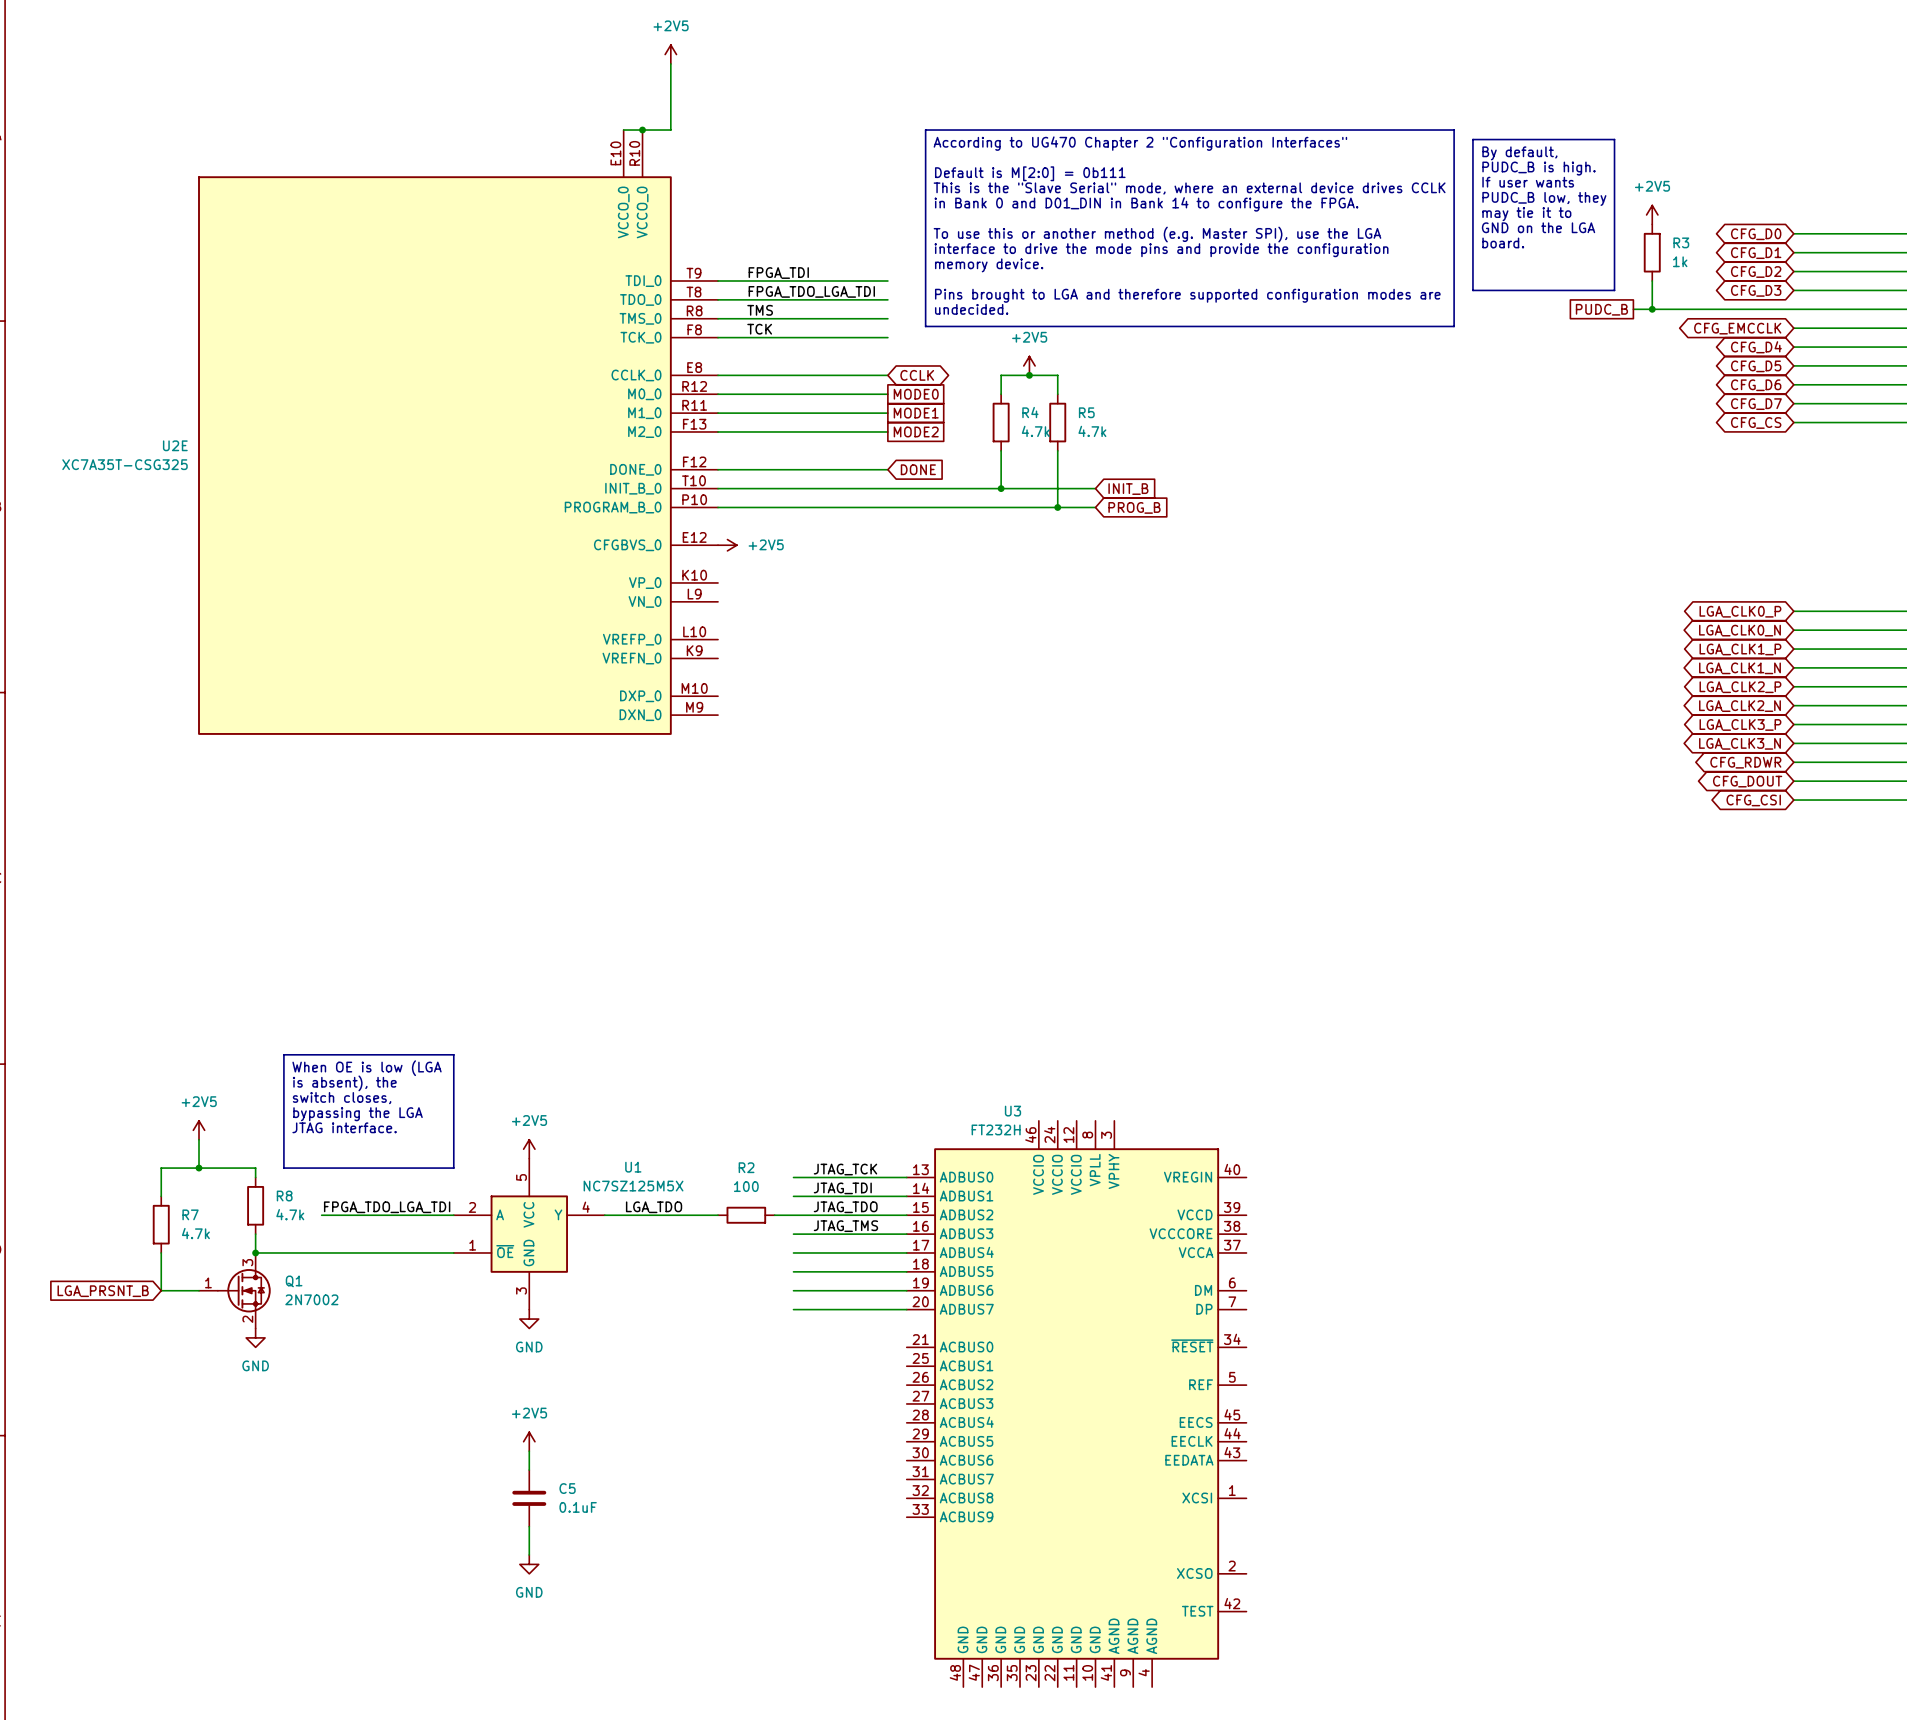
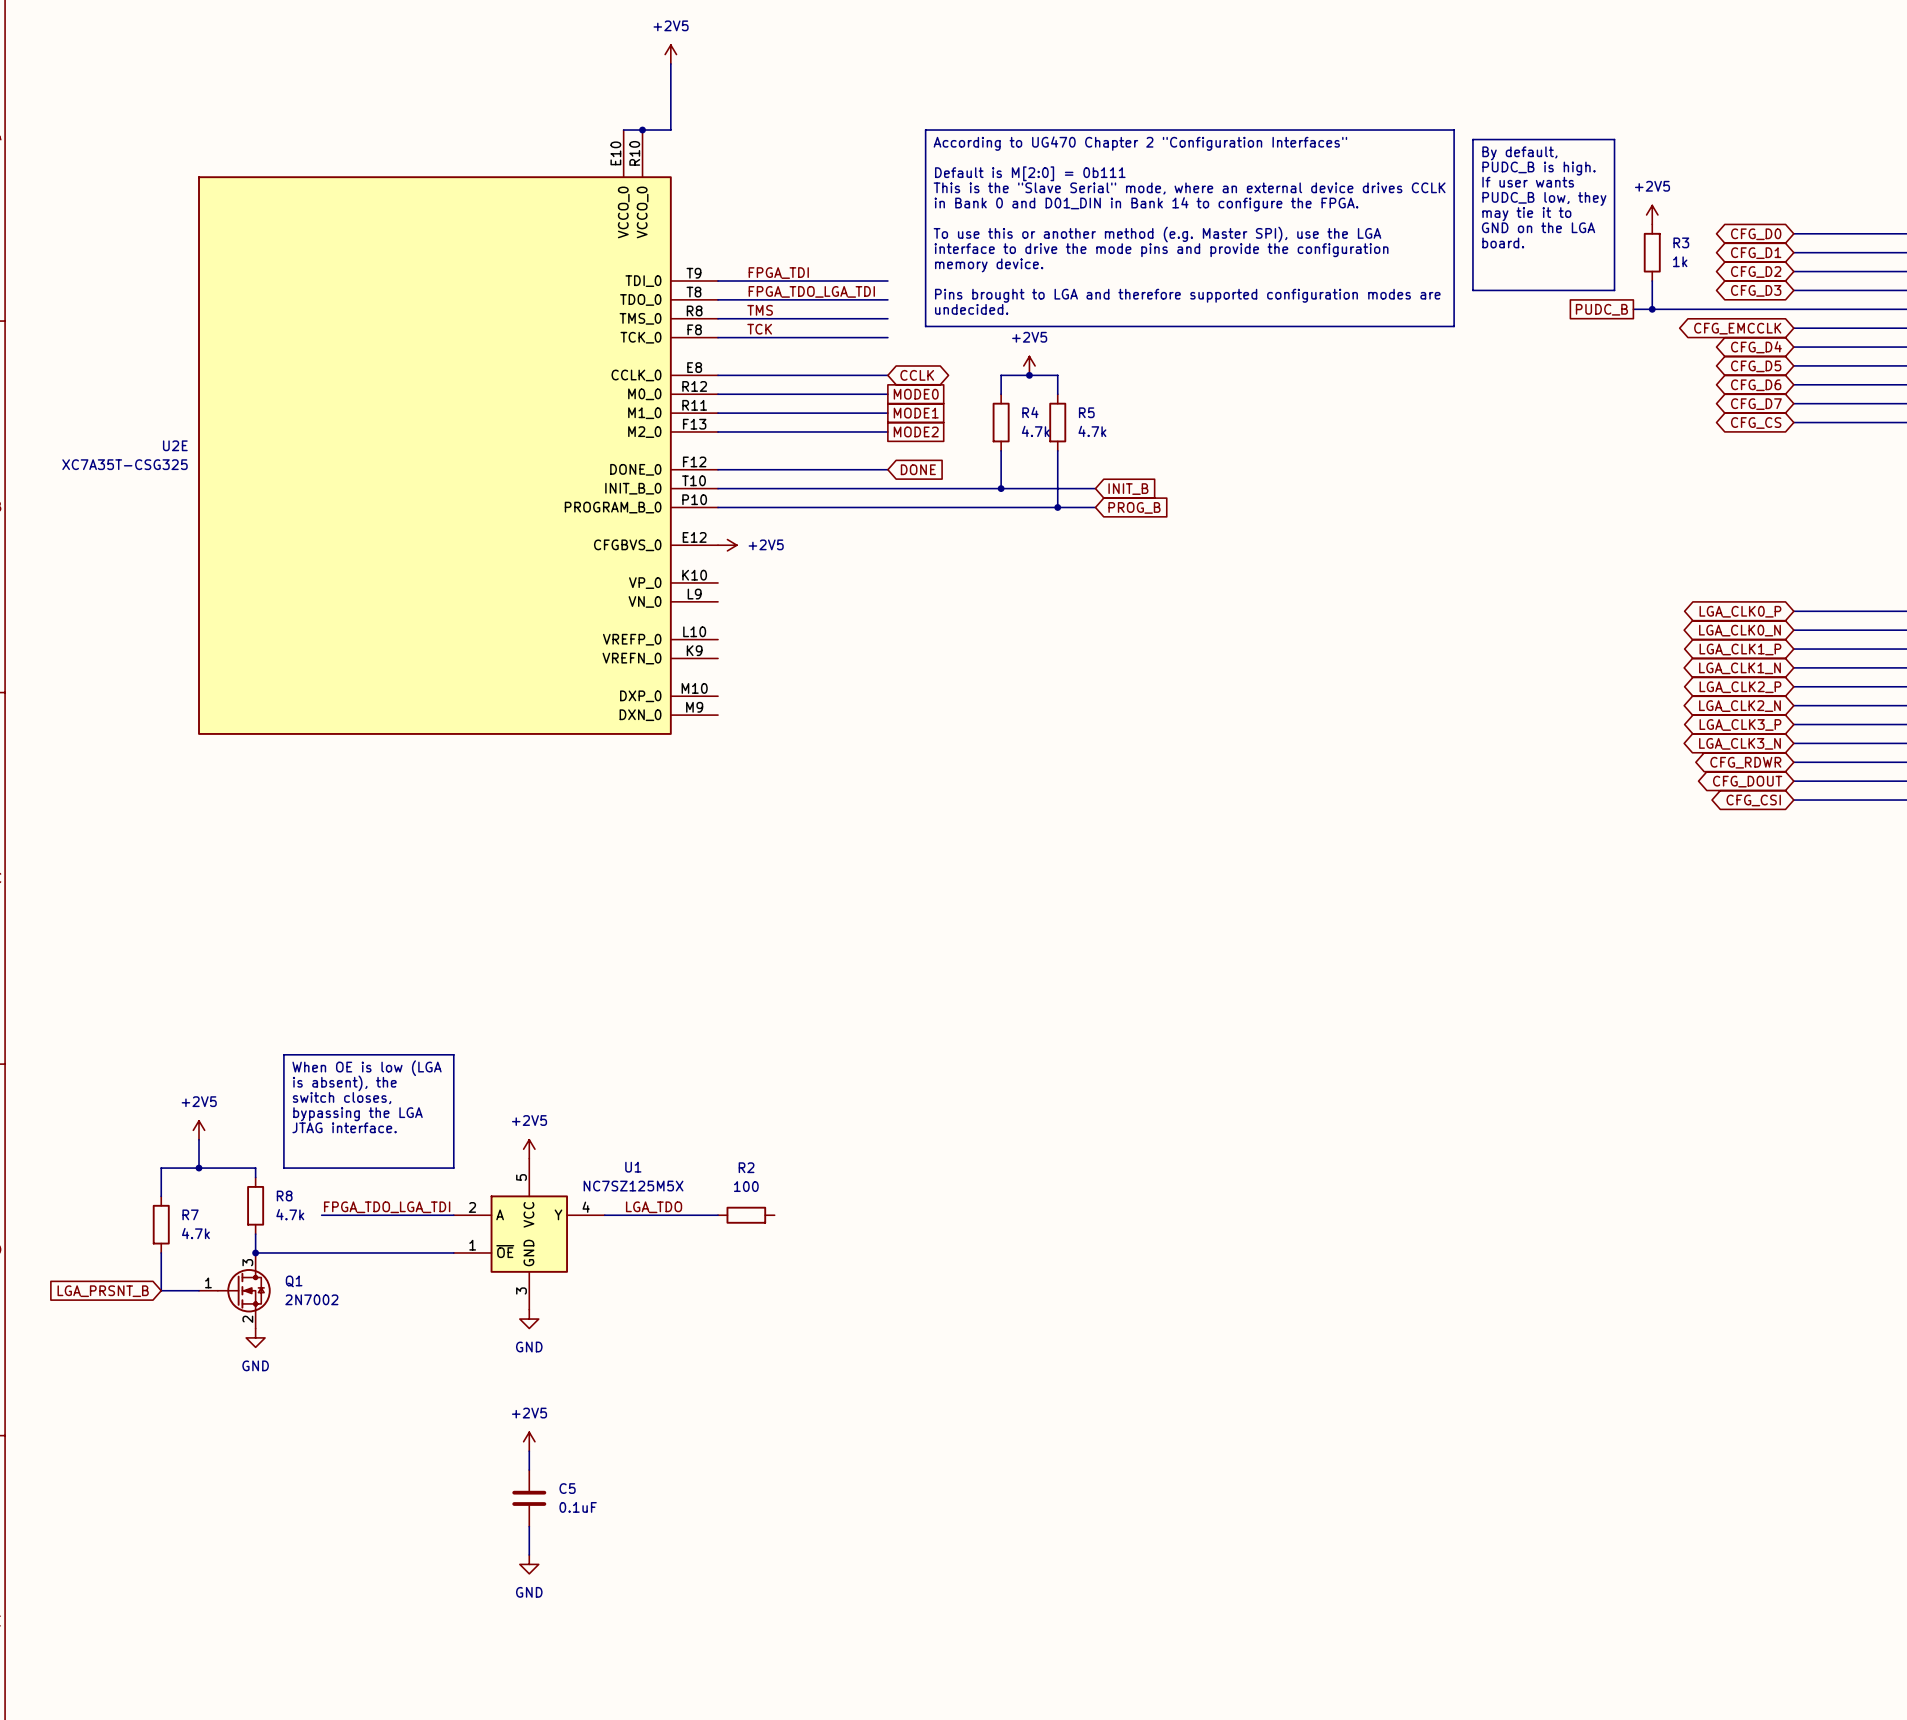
label: JTAG_TCK (845, 1169) -> none
wire: (793, 1177) (906, 1177) -> none
label: JTAG_TDI (842, 1188) -> none
wire: (793, 1196) (906, 1196) -> none
label: JTAG_TDO (845, 1207) -> none
wire: (774, 1215) (906, 1215) -> none
label: JTAG_TMS (845, 1226) -> none
wire: (793, 1234) (906, 1234) -> none
wire: (793, 1252) (906, 1252) -> none
wire: (793, 1271) (906, 1271) -> none
wire: (793, 1290) (906, 1290) -> none
wire: (793, 1309) (906, 1309) -> none
U3: FT232H (1076, 1403) -> none

